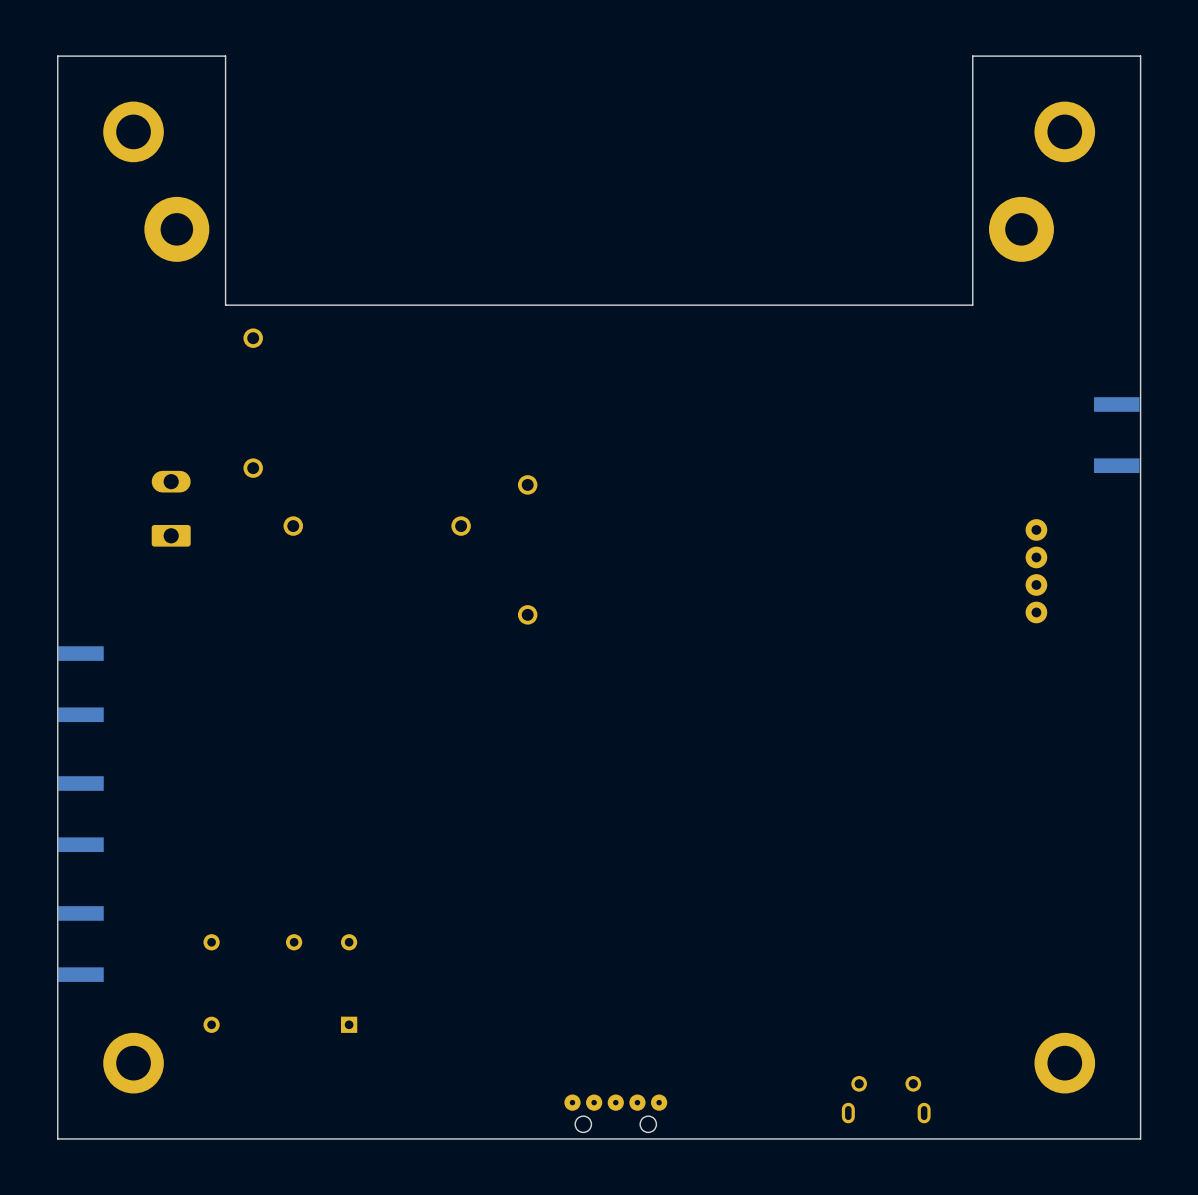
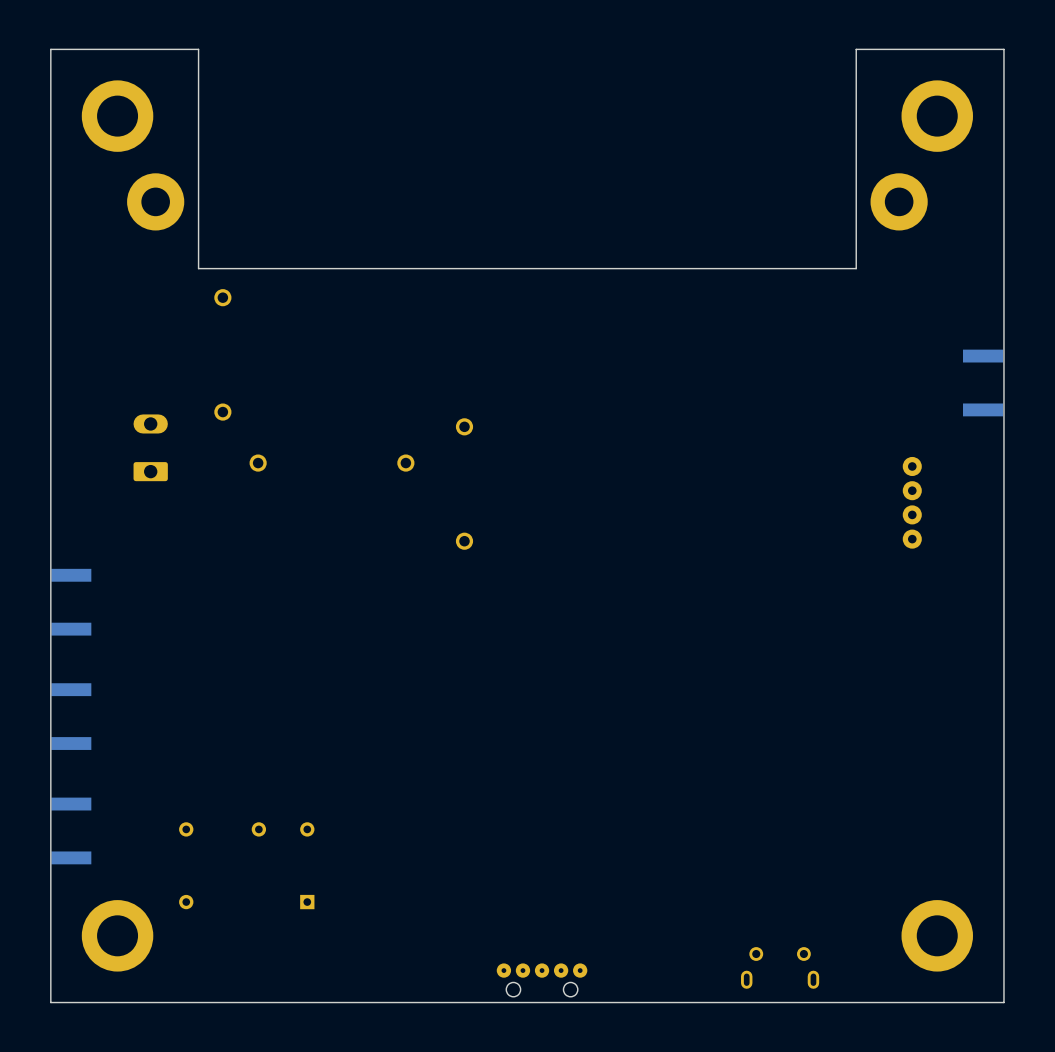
part footprint: [103, 101, 164, 163] -> [81, 80, 154, 152]
part footprint: [1034, 101, 1096, 163] -> [901, 80, 974, 152]
part footprint: [103, 1032, 164, 1094] -> [81, 900, 154, 972]
part footprint: [1034, 1032, 1096, 1094] -> [901, 900, 974, 972]

